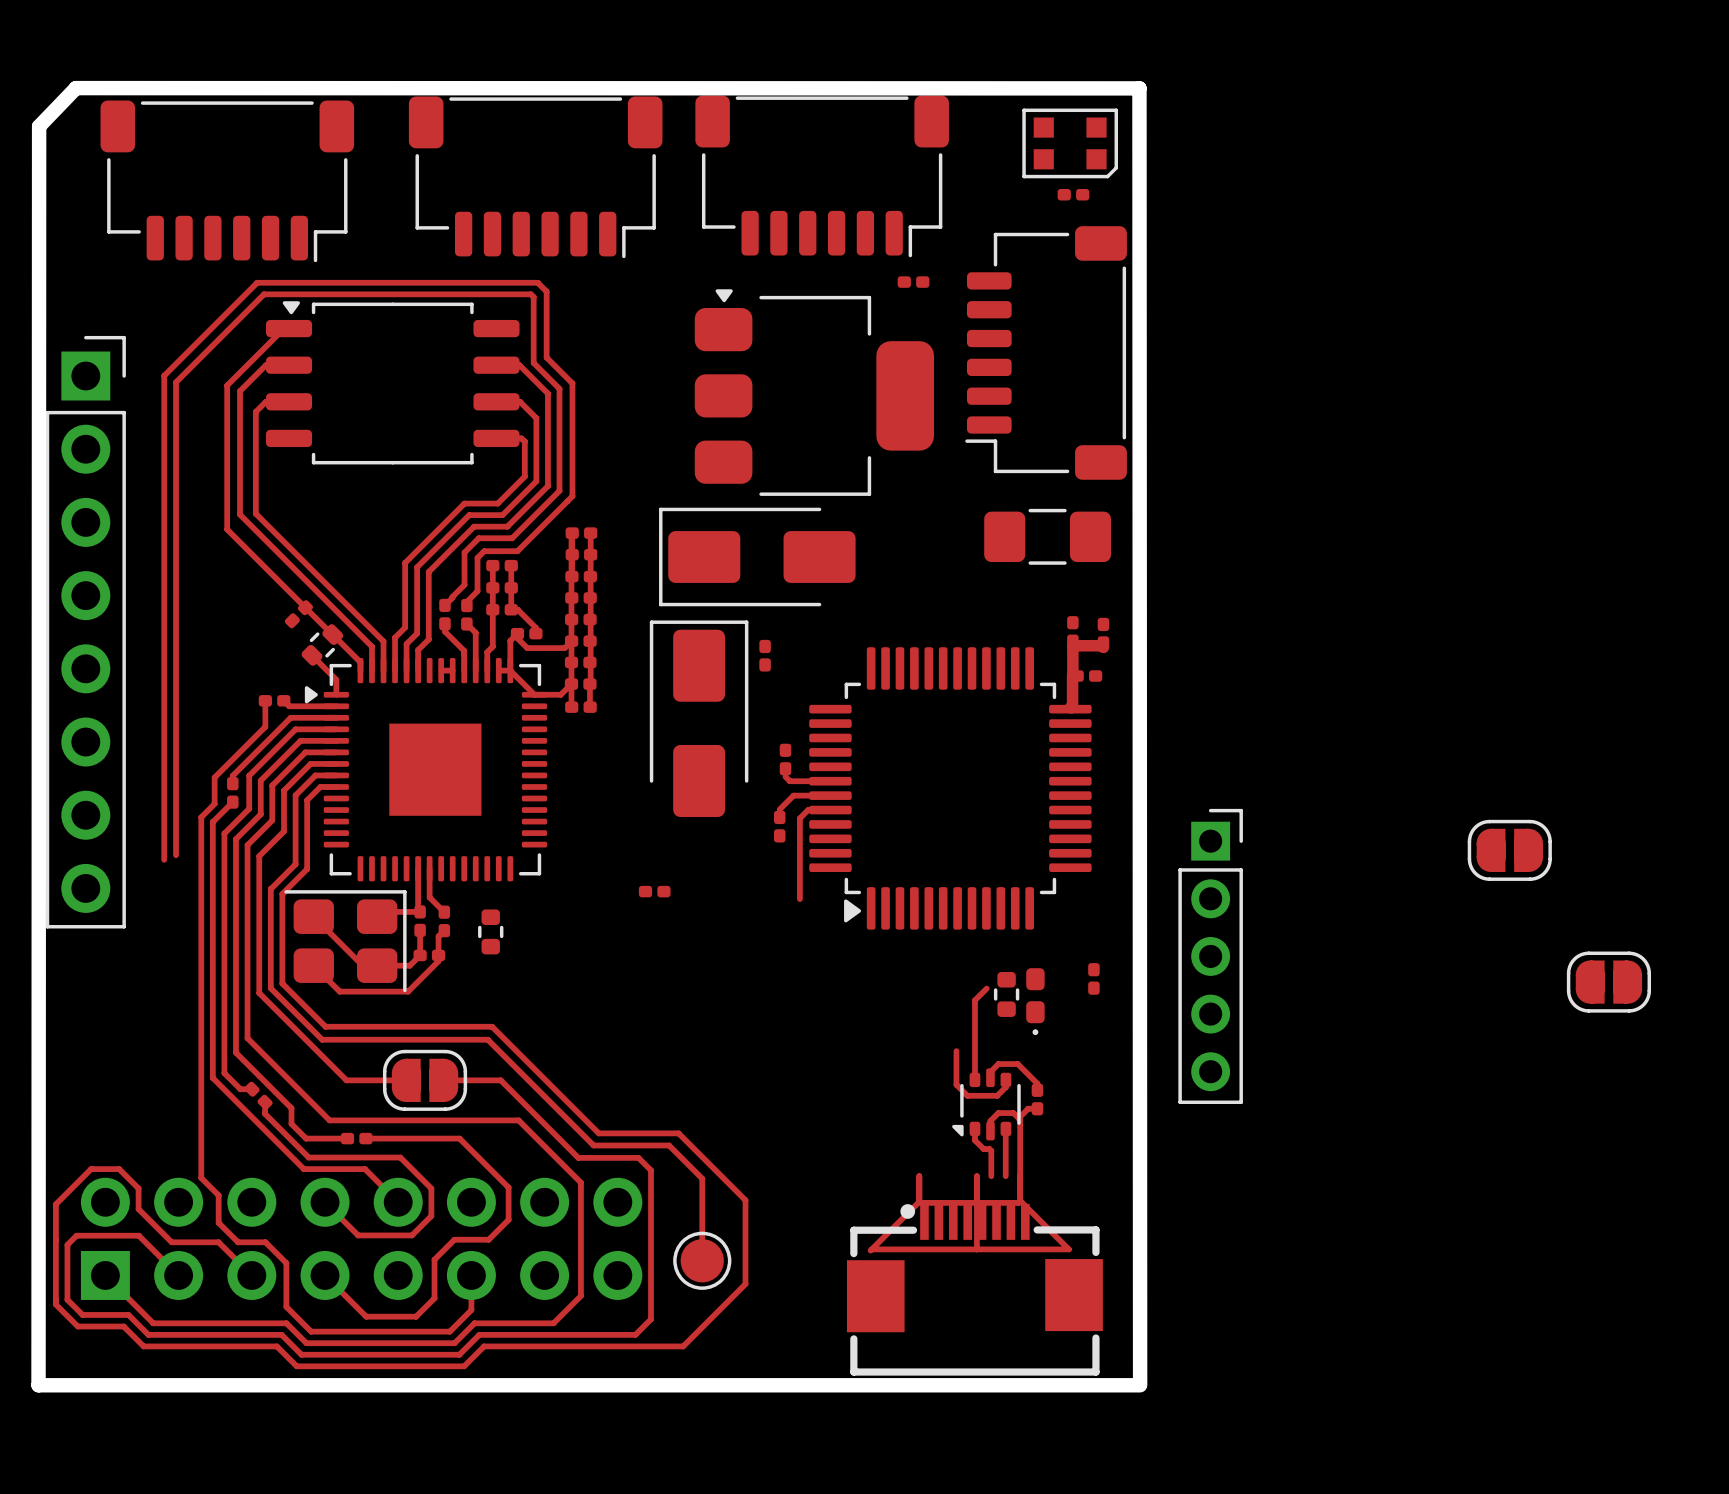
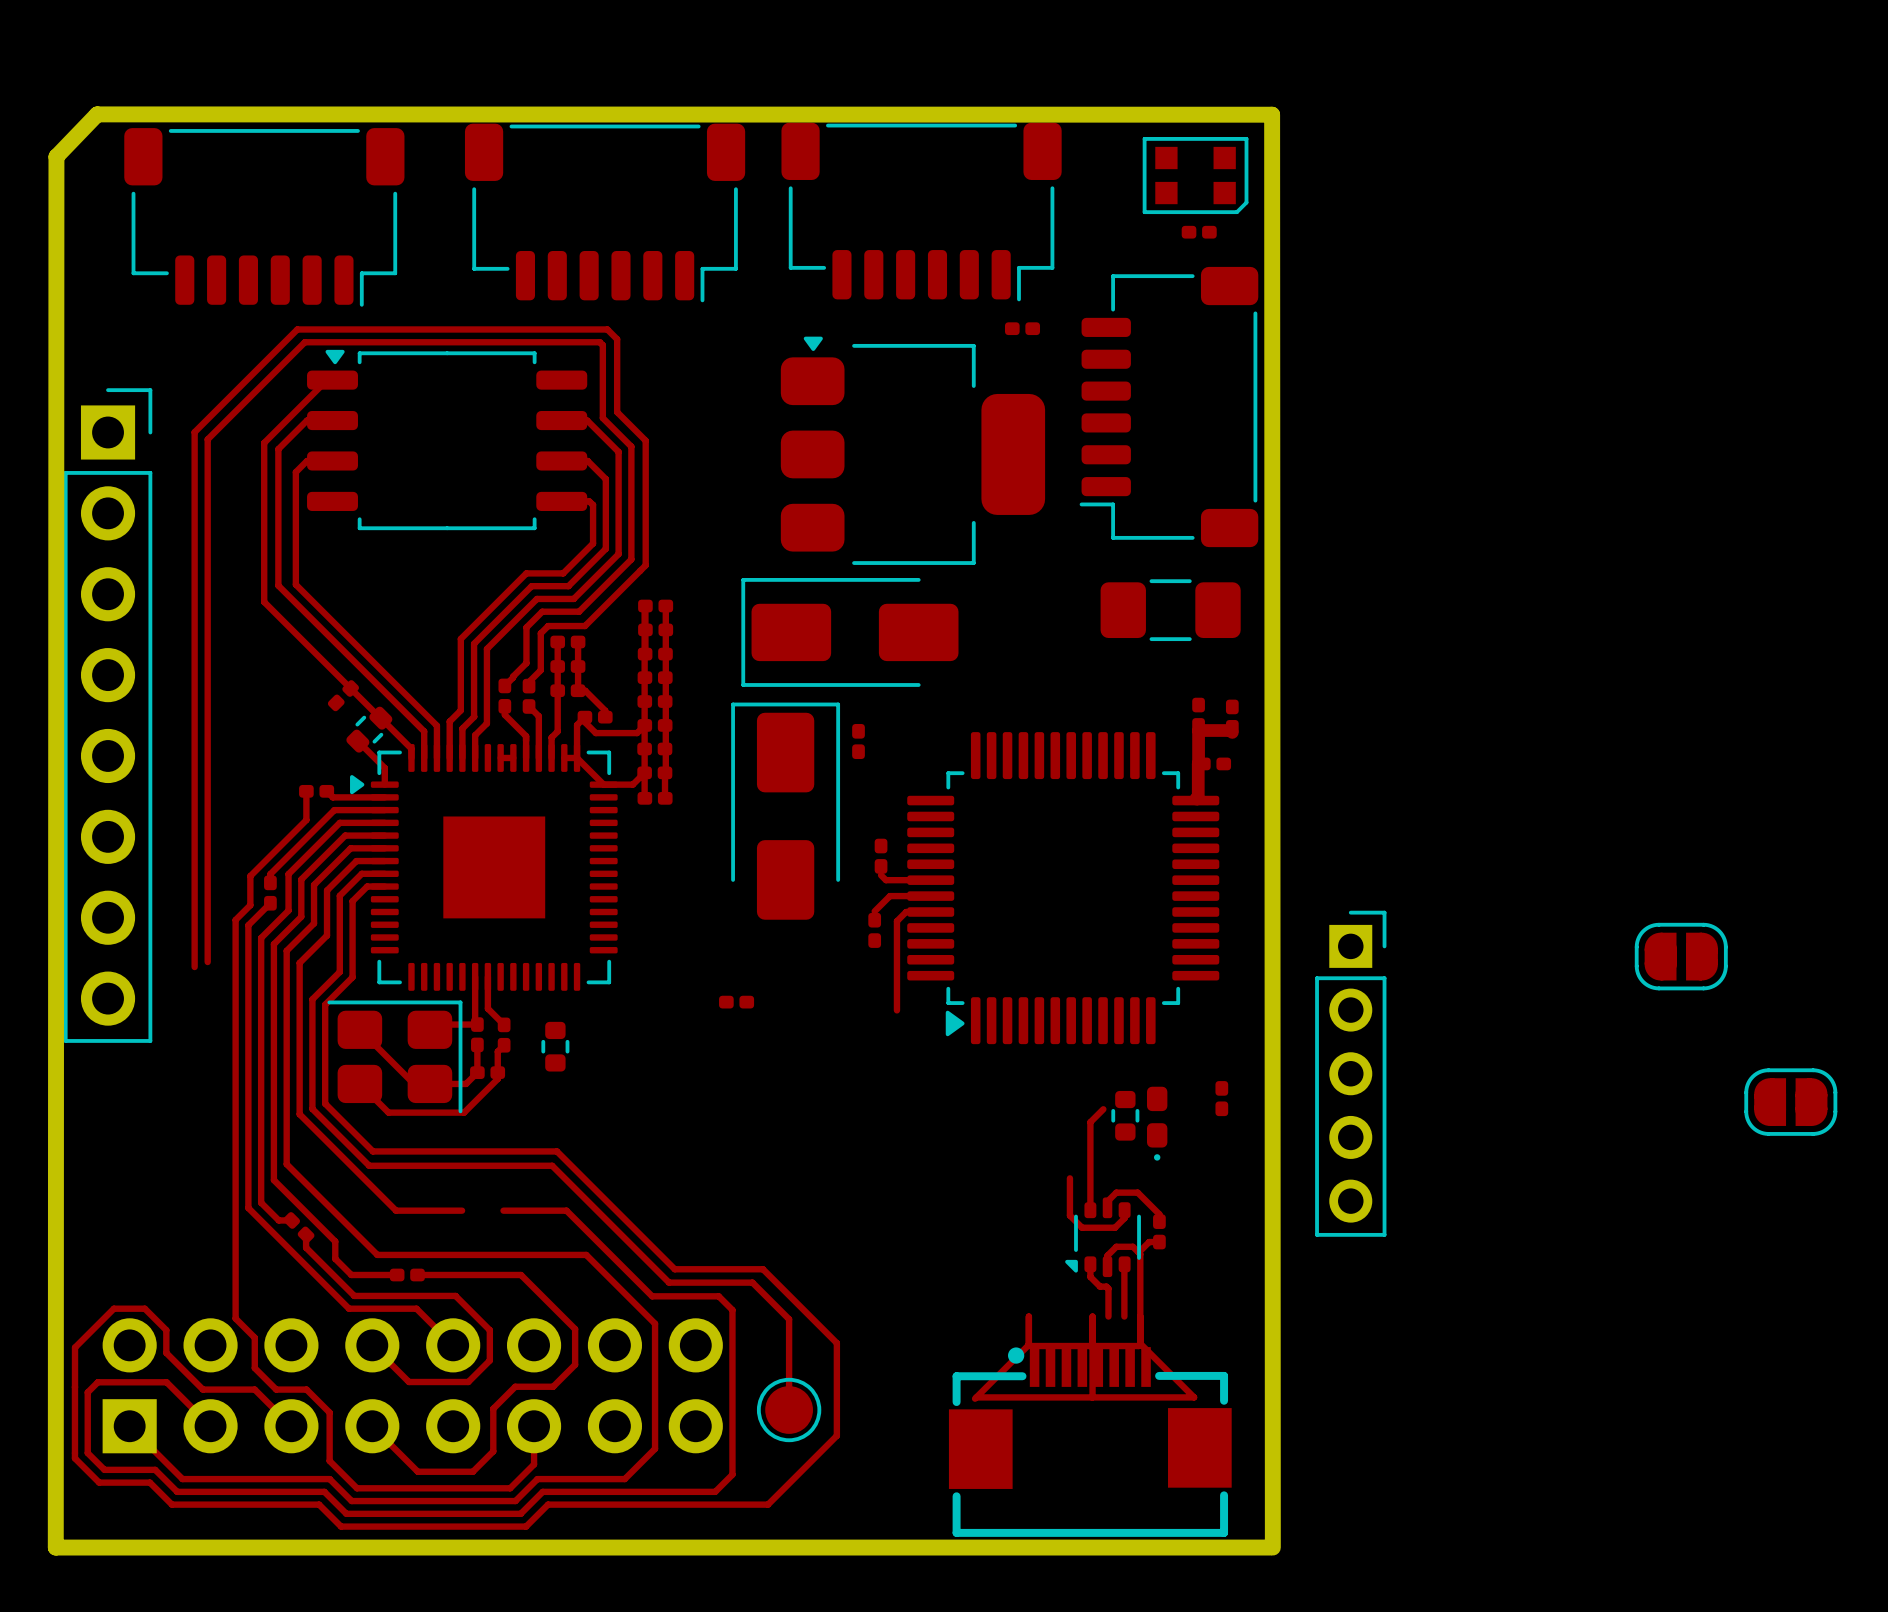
part: (425, 1080) -> none

